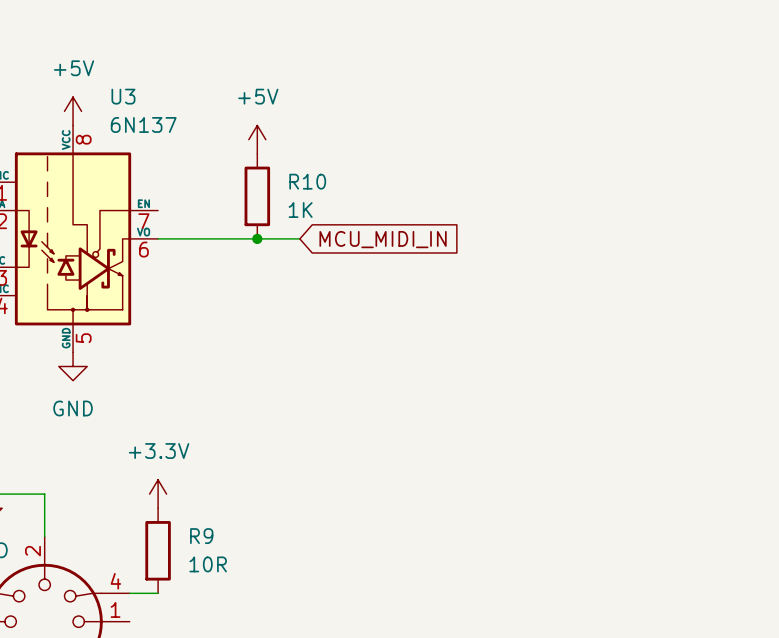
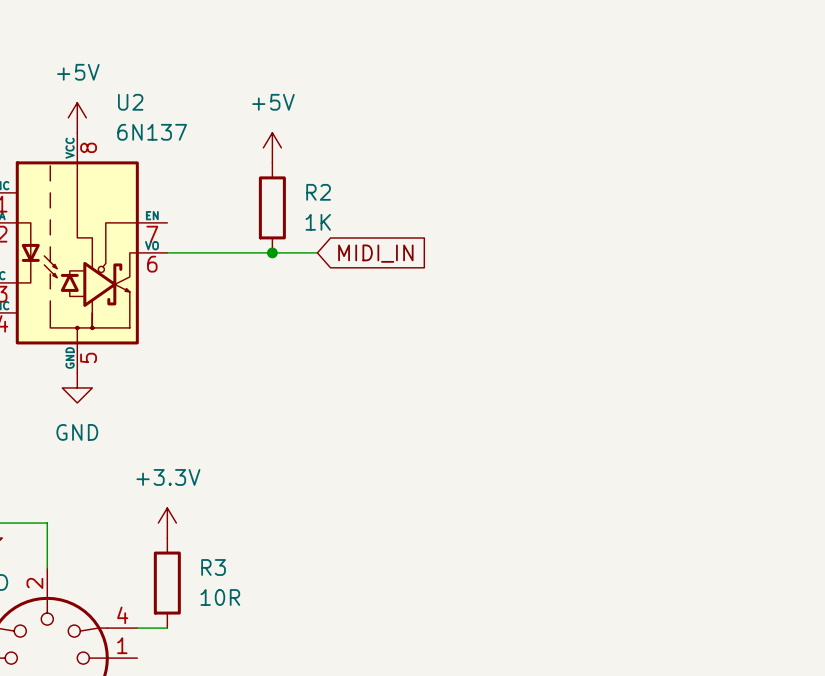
U3 name: U3 (123, 96) -> U2 (130, 102)
R10 name: R10 (307, 181) -> R2 (318, 192)
global label: MCU_MIDI_IN (383, 239) -> MIDI_IN (375, 253)
R9 name: R9 (201, 536) -> R3 (213, 567)

